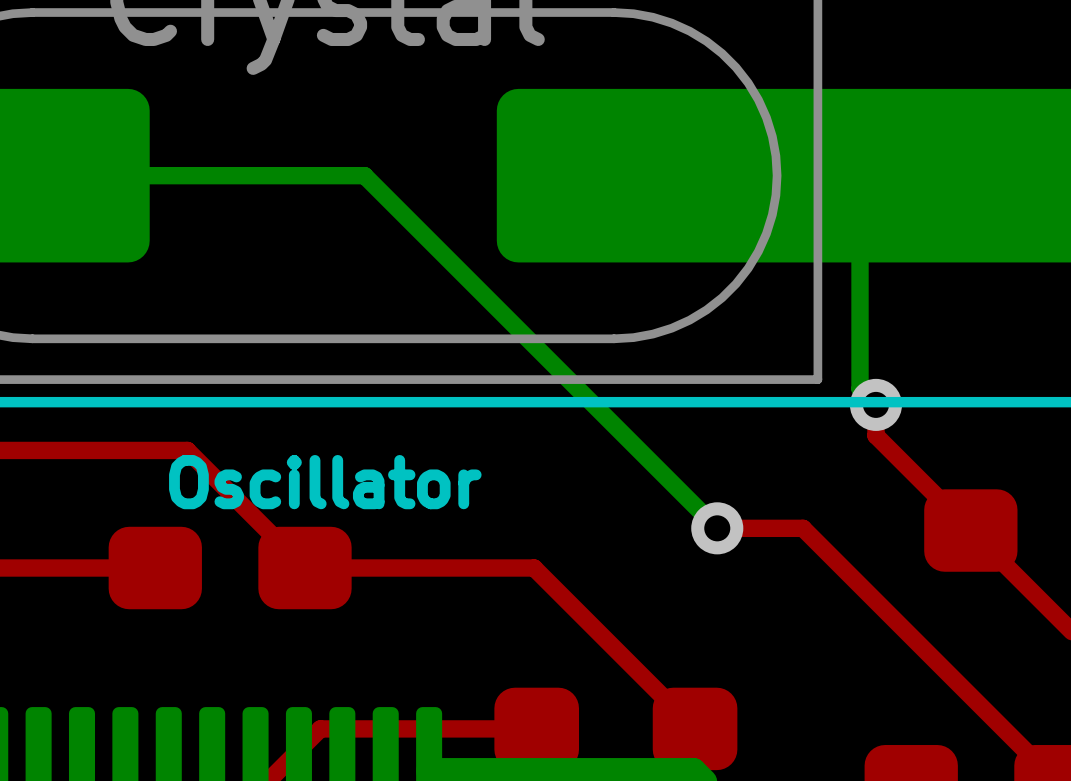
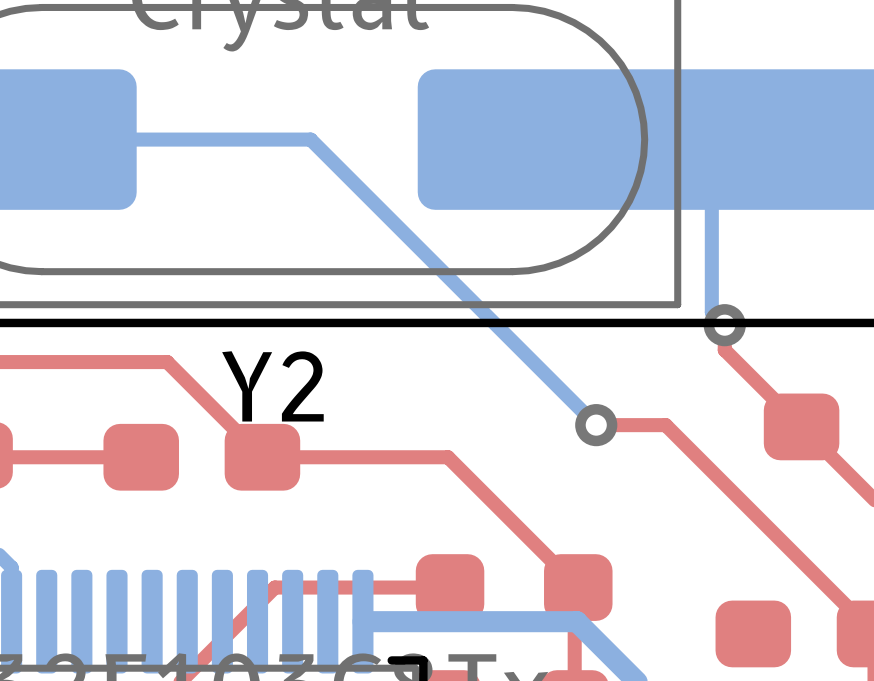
Oscillator name: Oscillator (325, 482) -> Y2 (272, 386)

